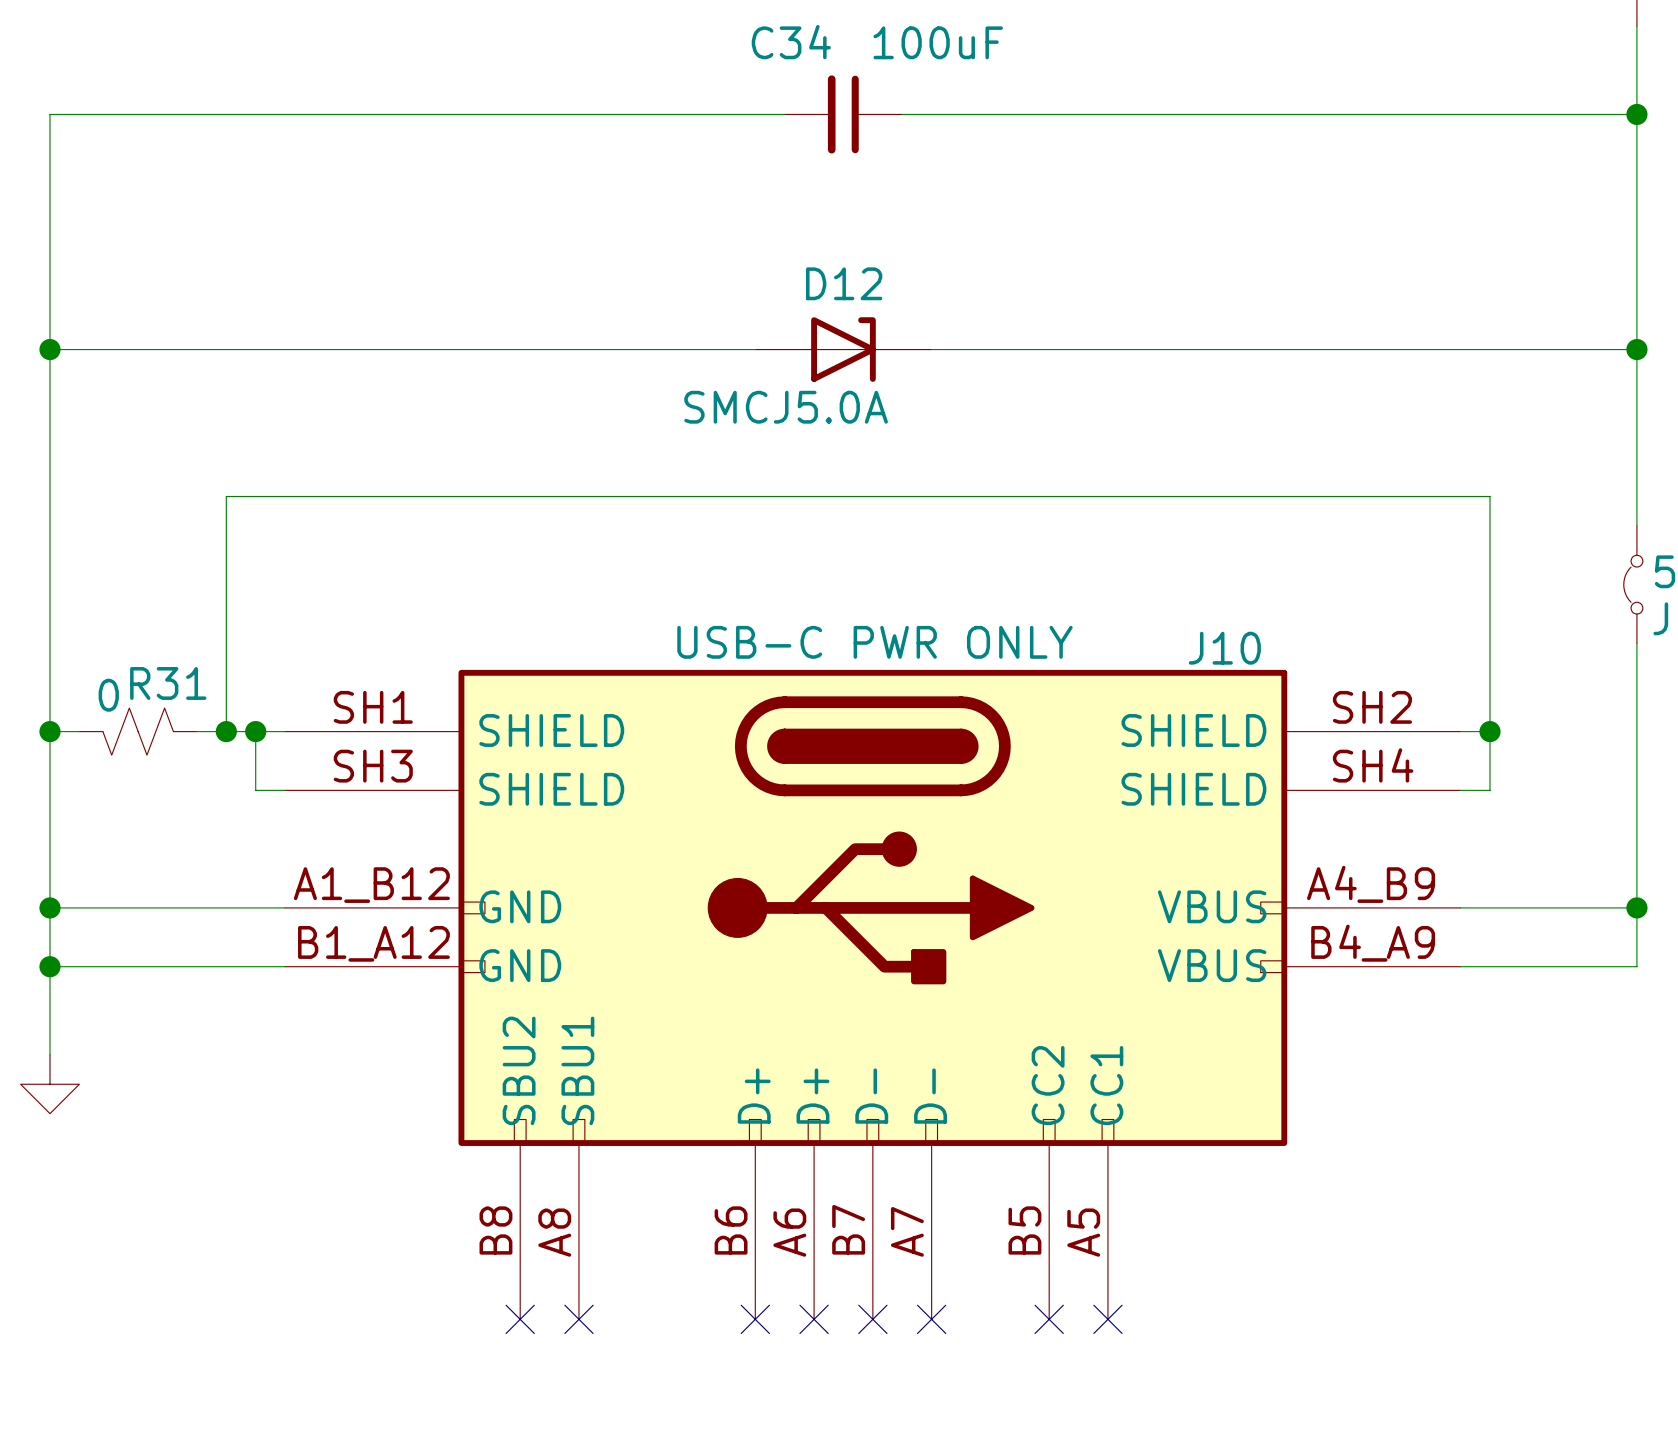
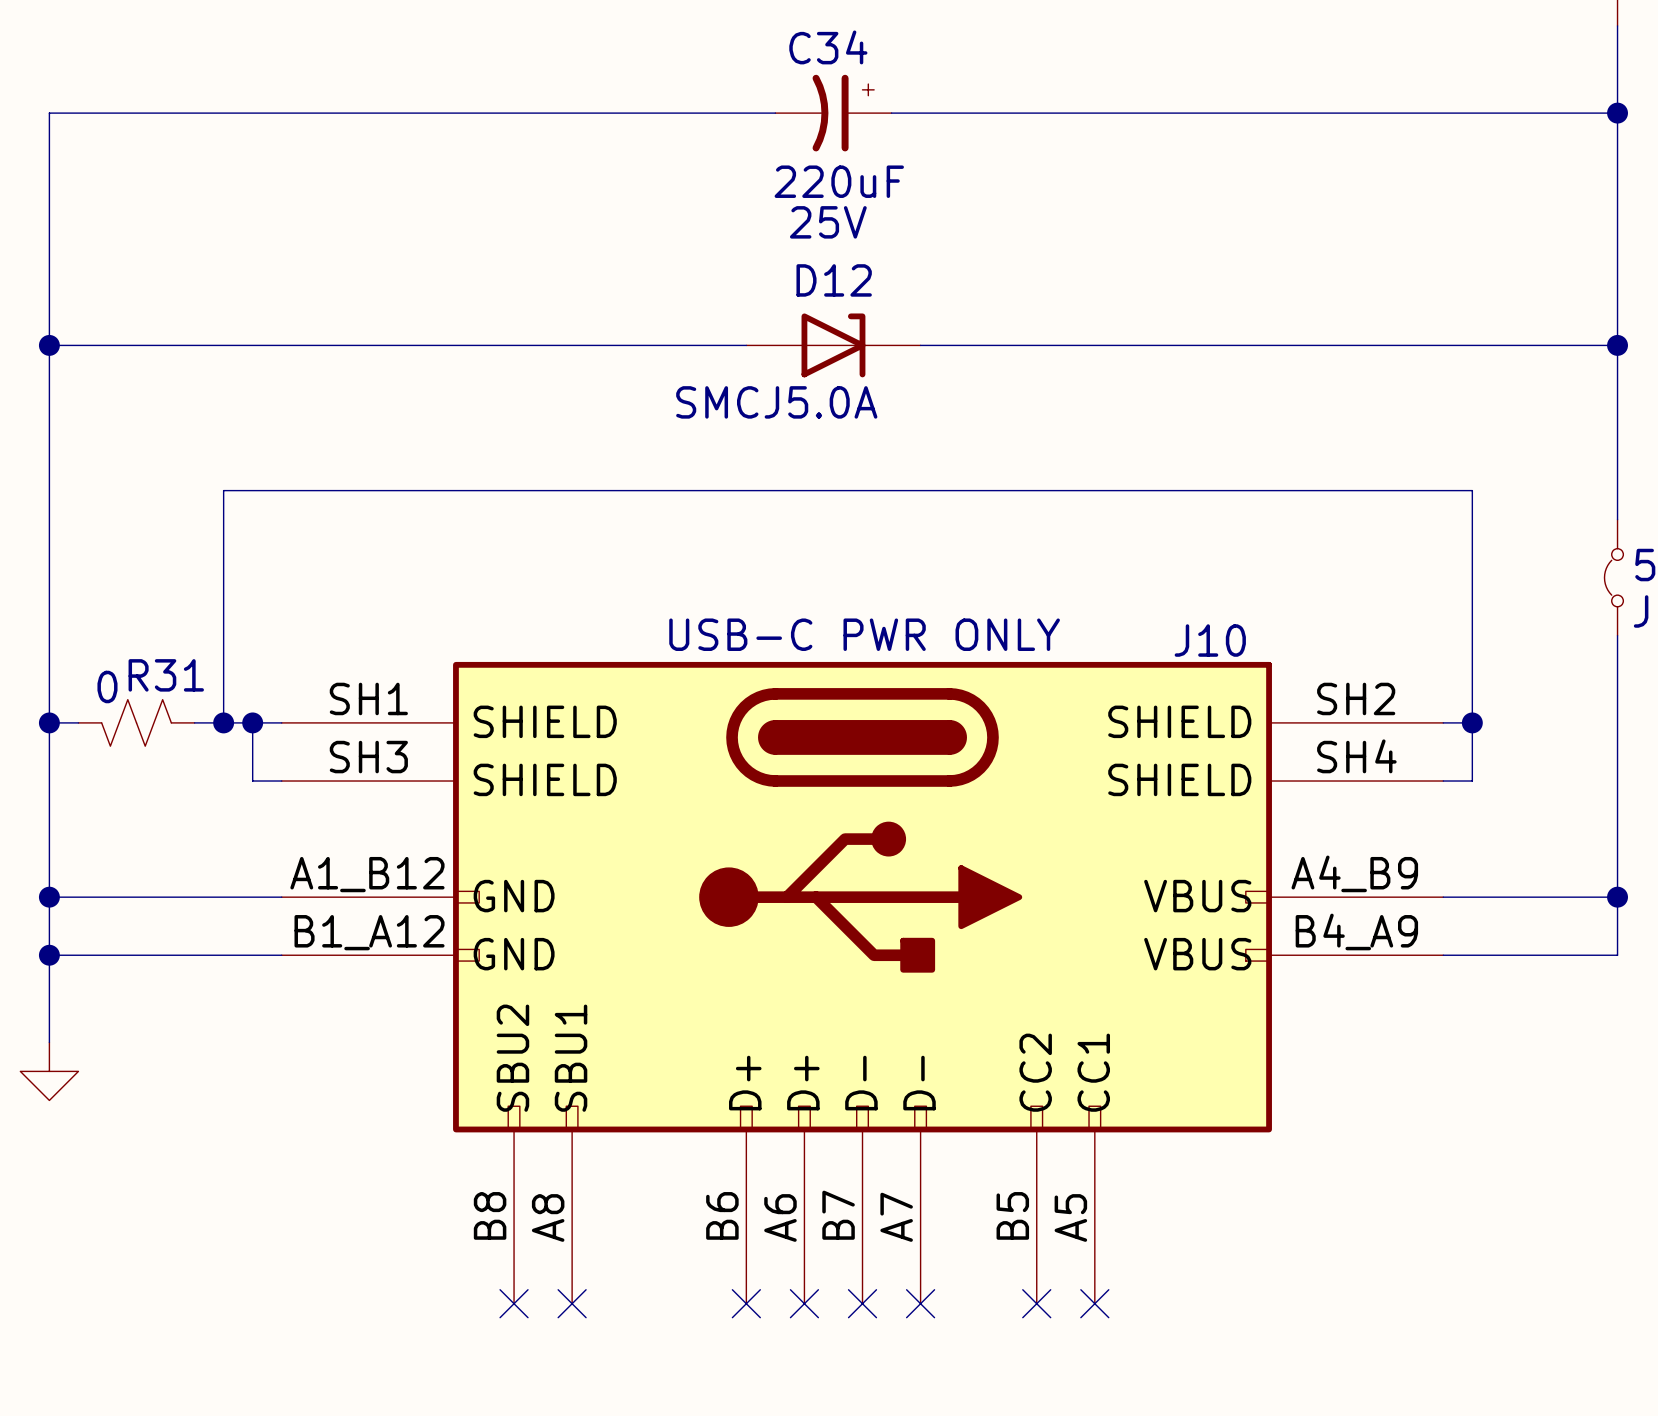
C34 name position: C34 (791, 42) -> C34 (828, 47)
C34 value: 100uF (938, 42) -> 220uF (839, 181)
C34 symbol: [784, 75, 903, 154] -> [775, 74, 892, 152]
C34 text: none -> 25V (828, 222)

